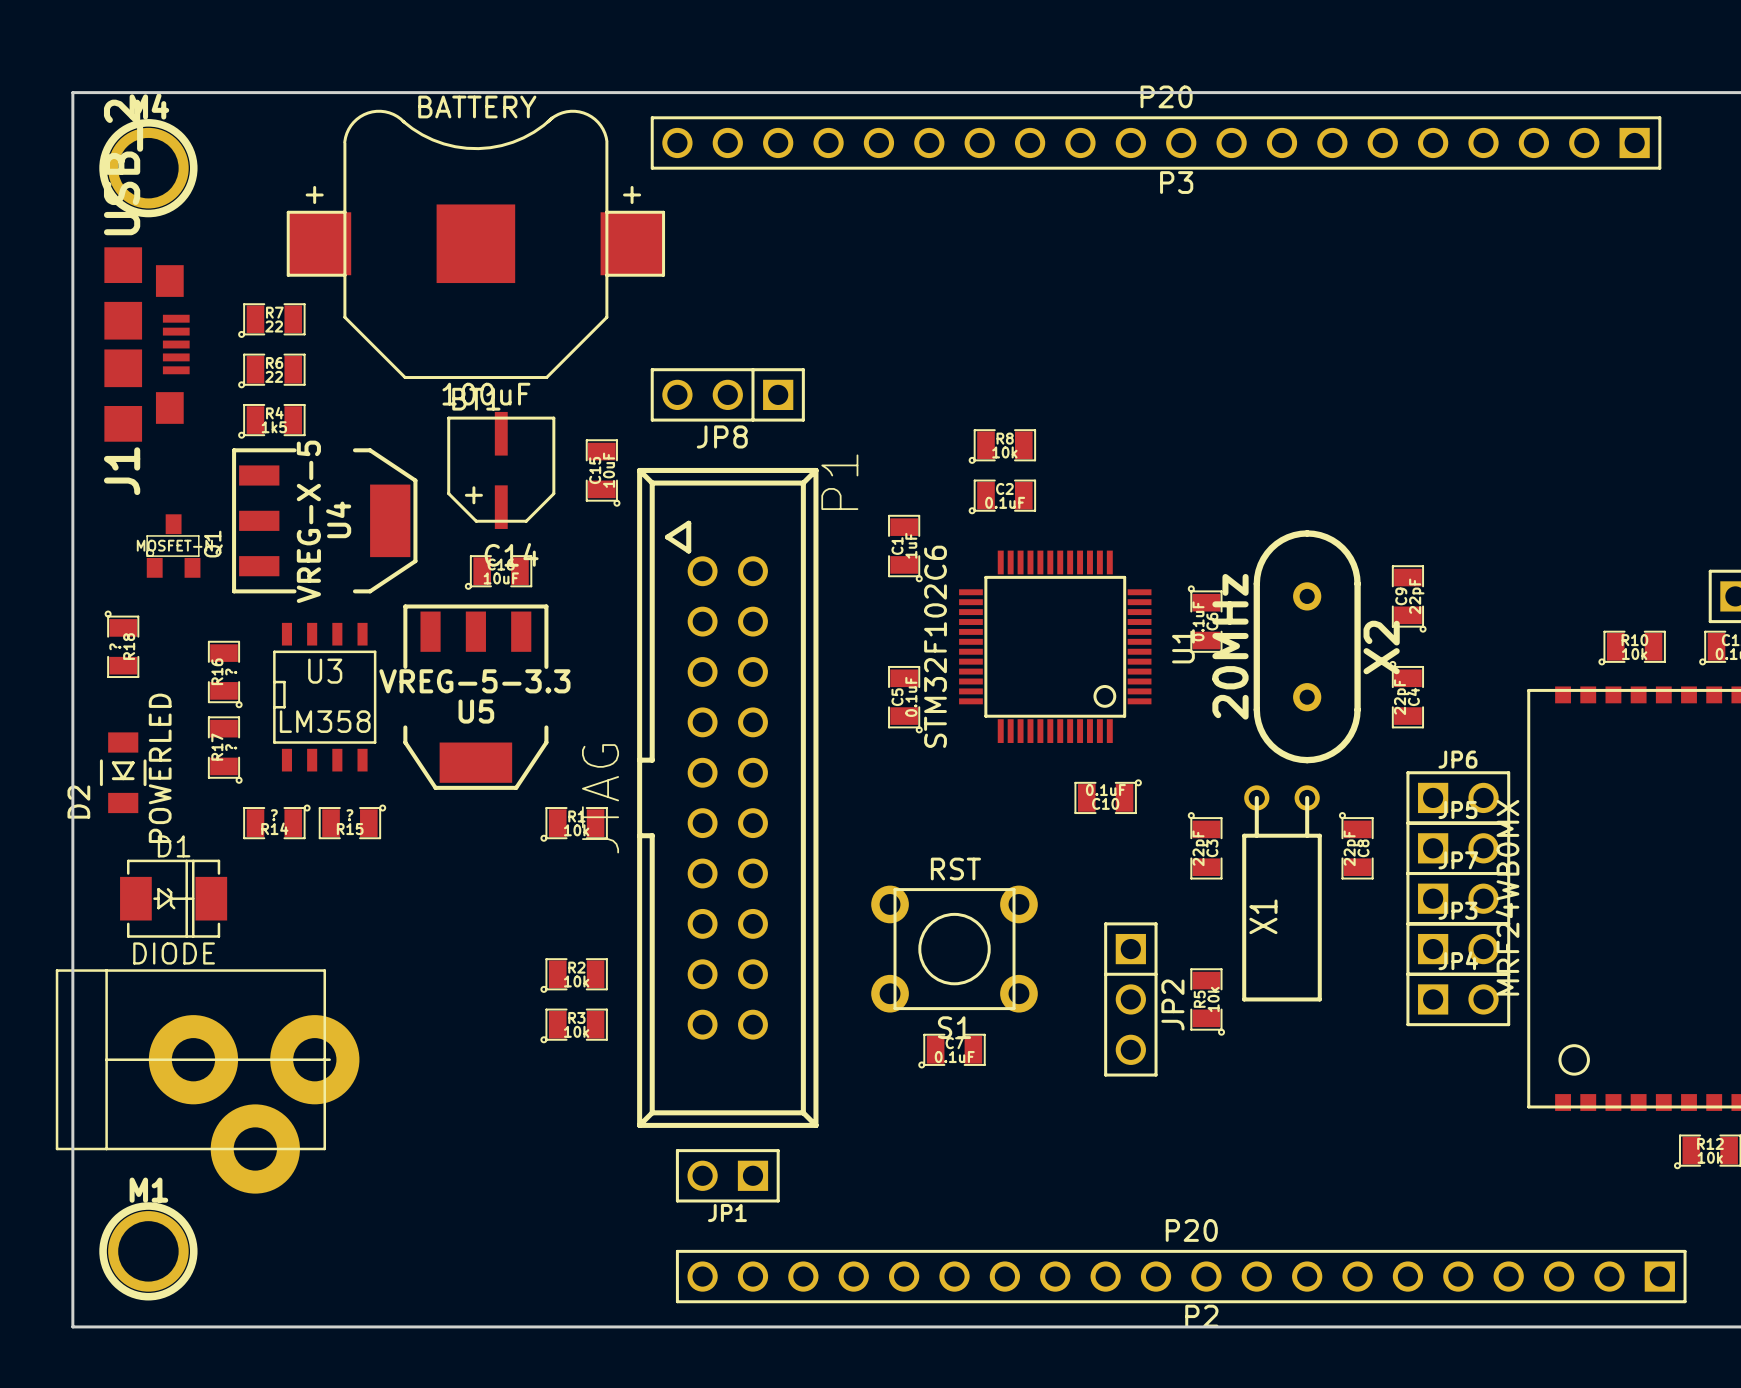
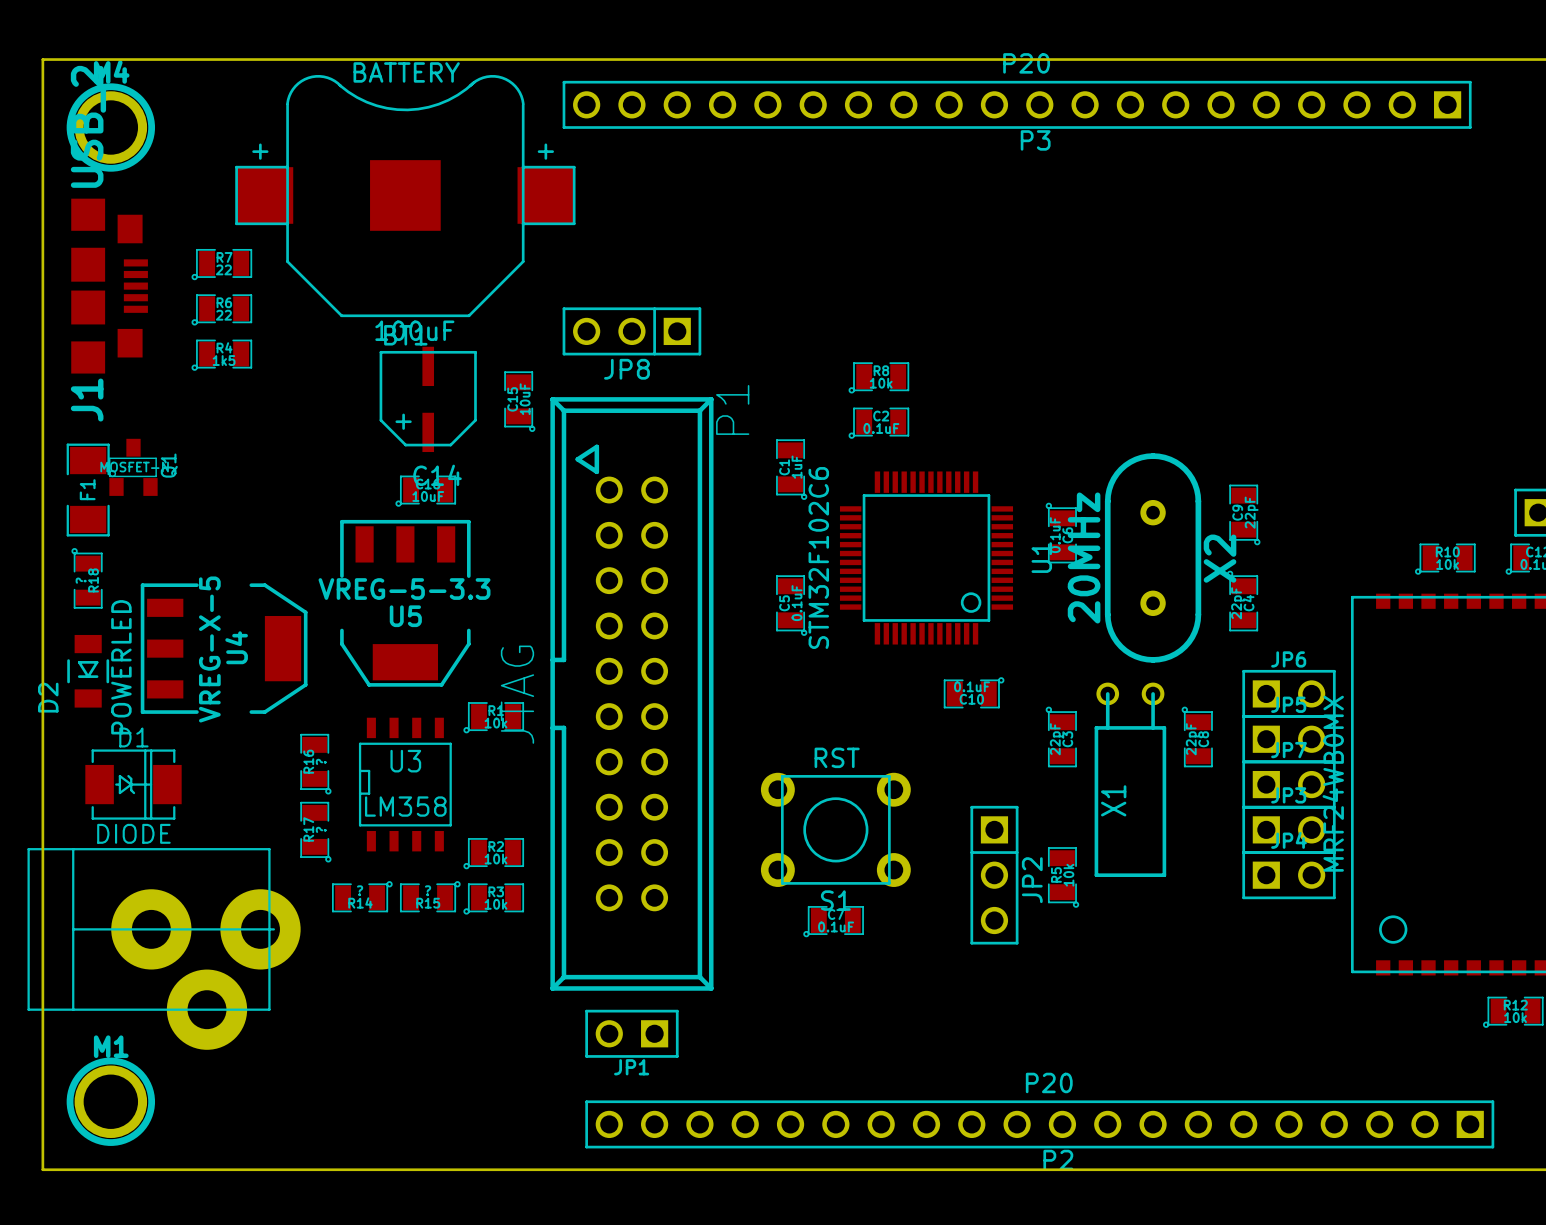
U4 position: (324, 520) -> (224, 648)
F1: none -> (88, 490)
R18 position: (121, 644) -> (87, 578)
R16 position: (225, 674) -> (315, 764)
U3 position: (324, 697) -> (405, 784)
R17 position: (225, 750) -> (315, 832)
R14 position: (276, 821) -> (362, 896)
R15 position: (352, 821) -> (430, 896)

